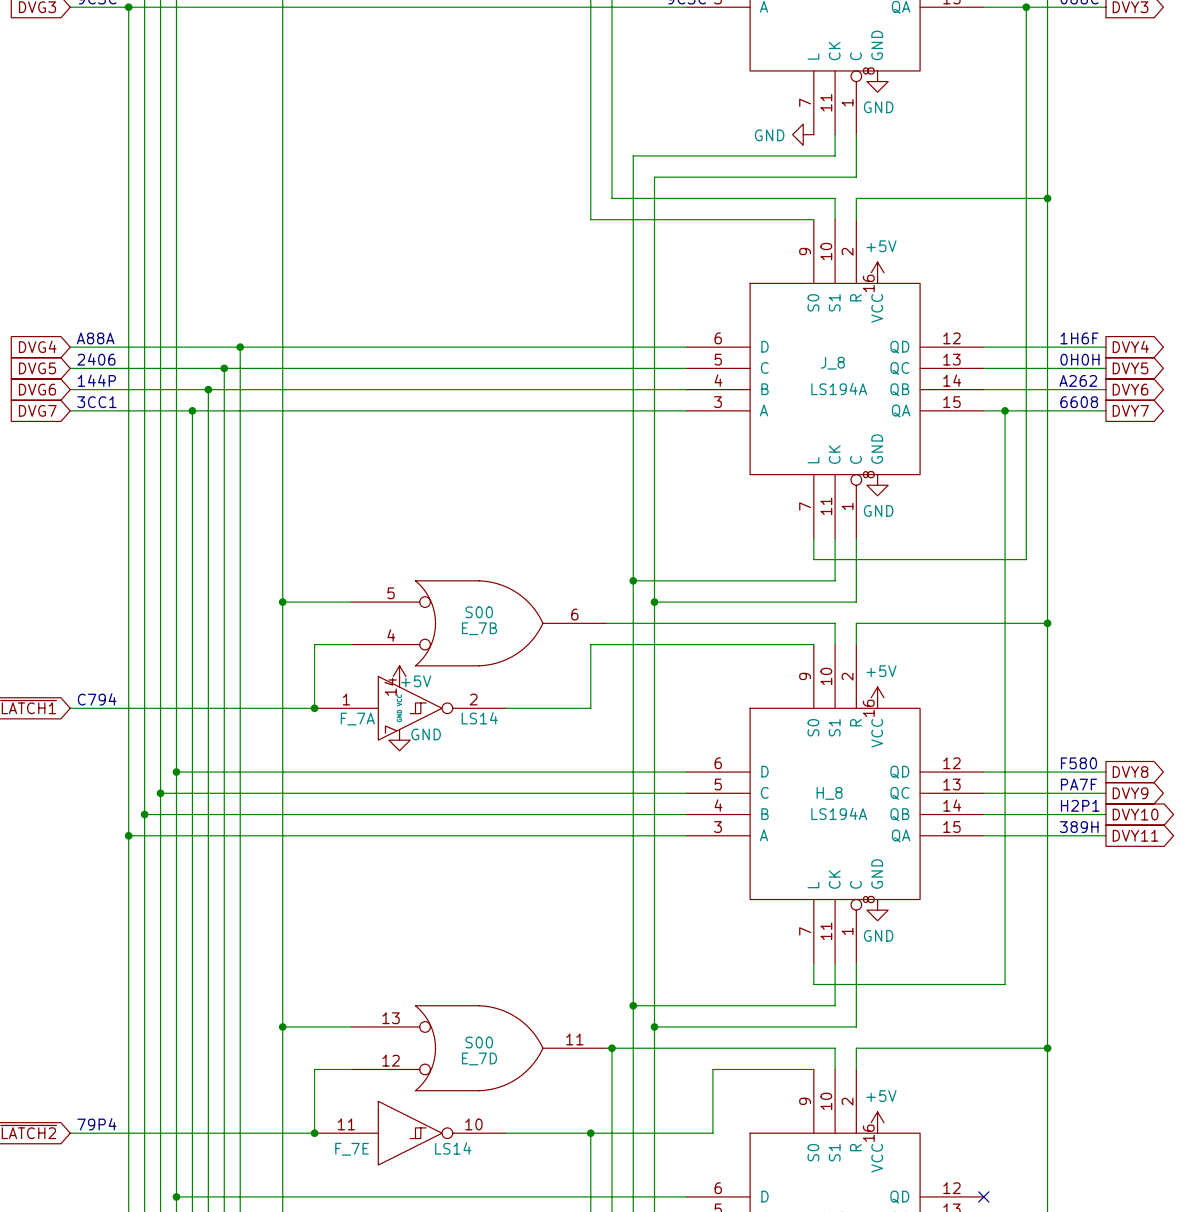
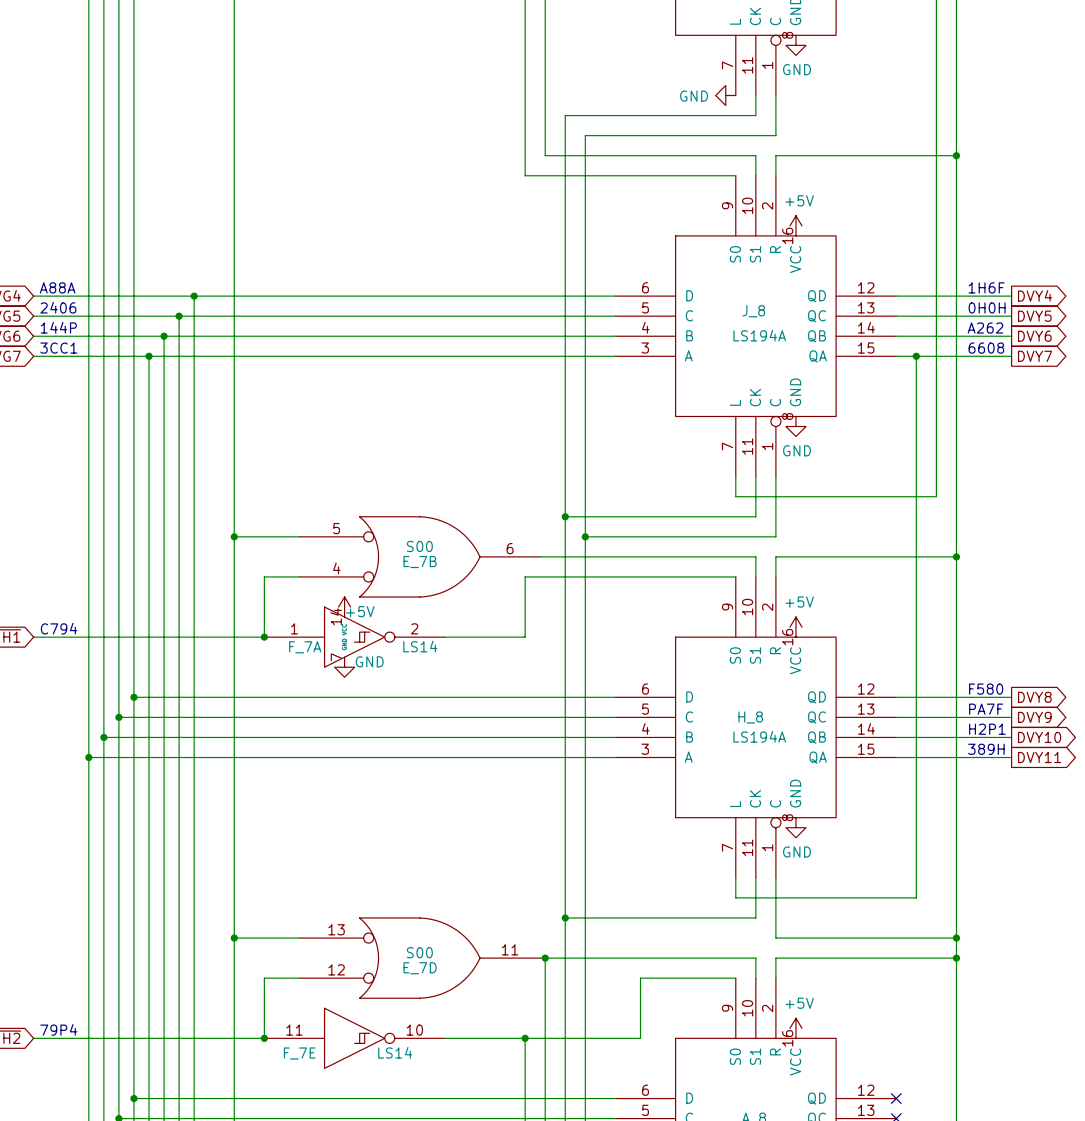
wire: (654, 1026) (856, 1026) -> (956, 938) (775, 938)
junction: (654, 1026) -> none
junction: none -> (956, 938)

